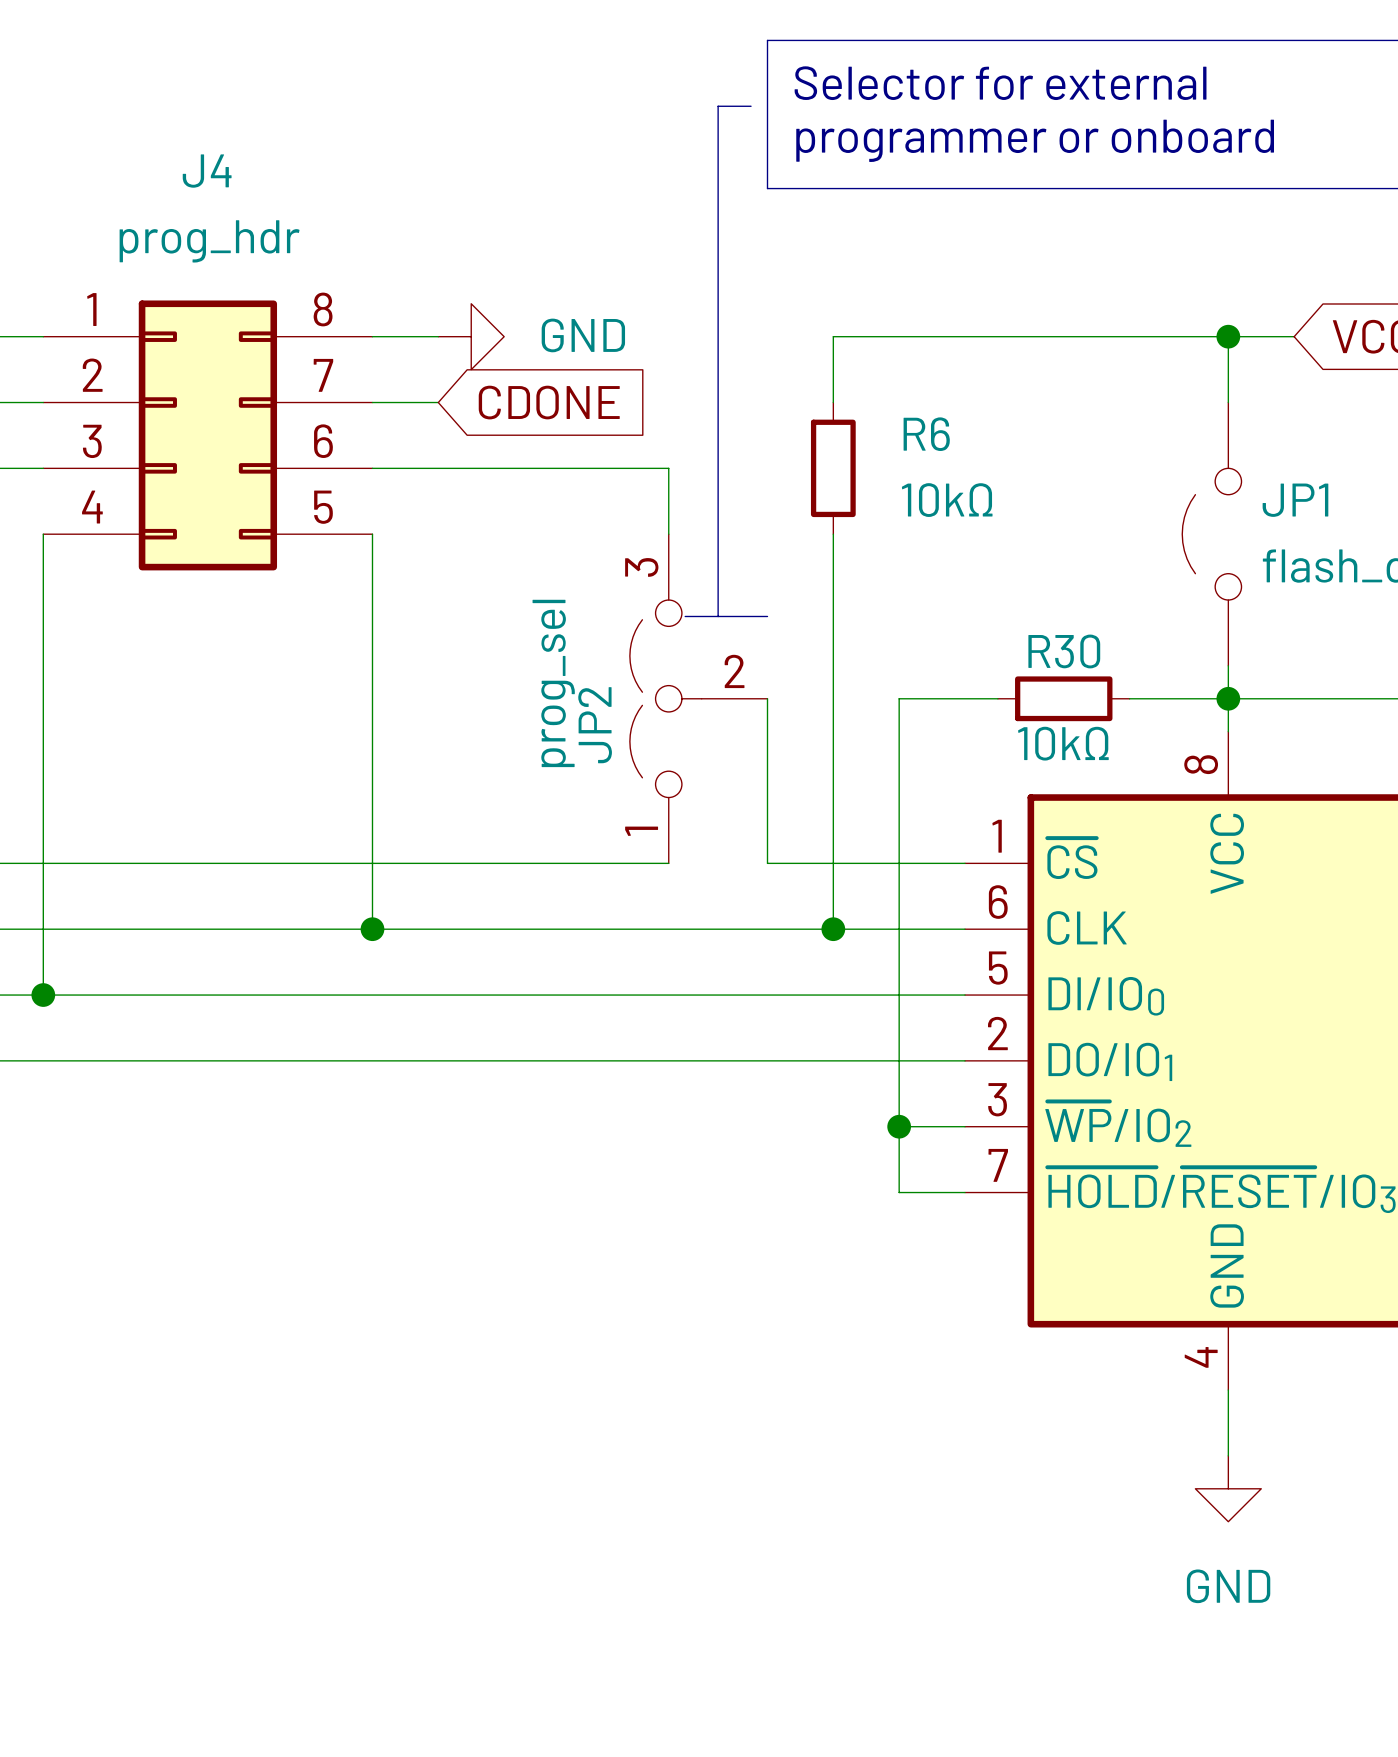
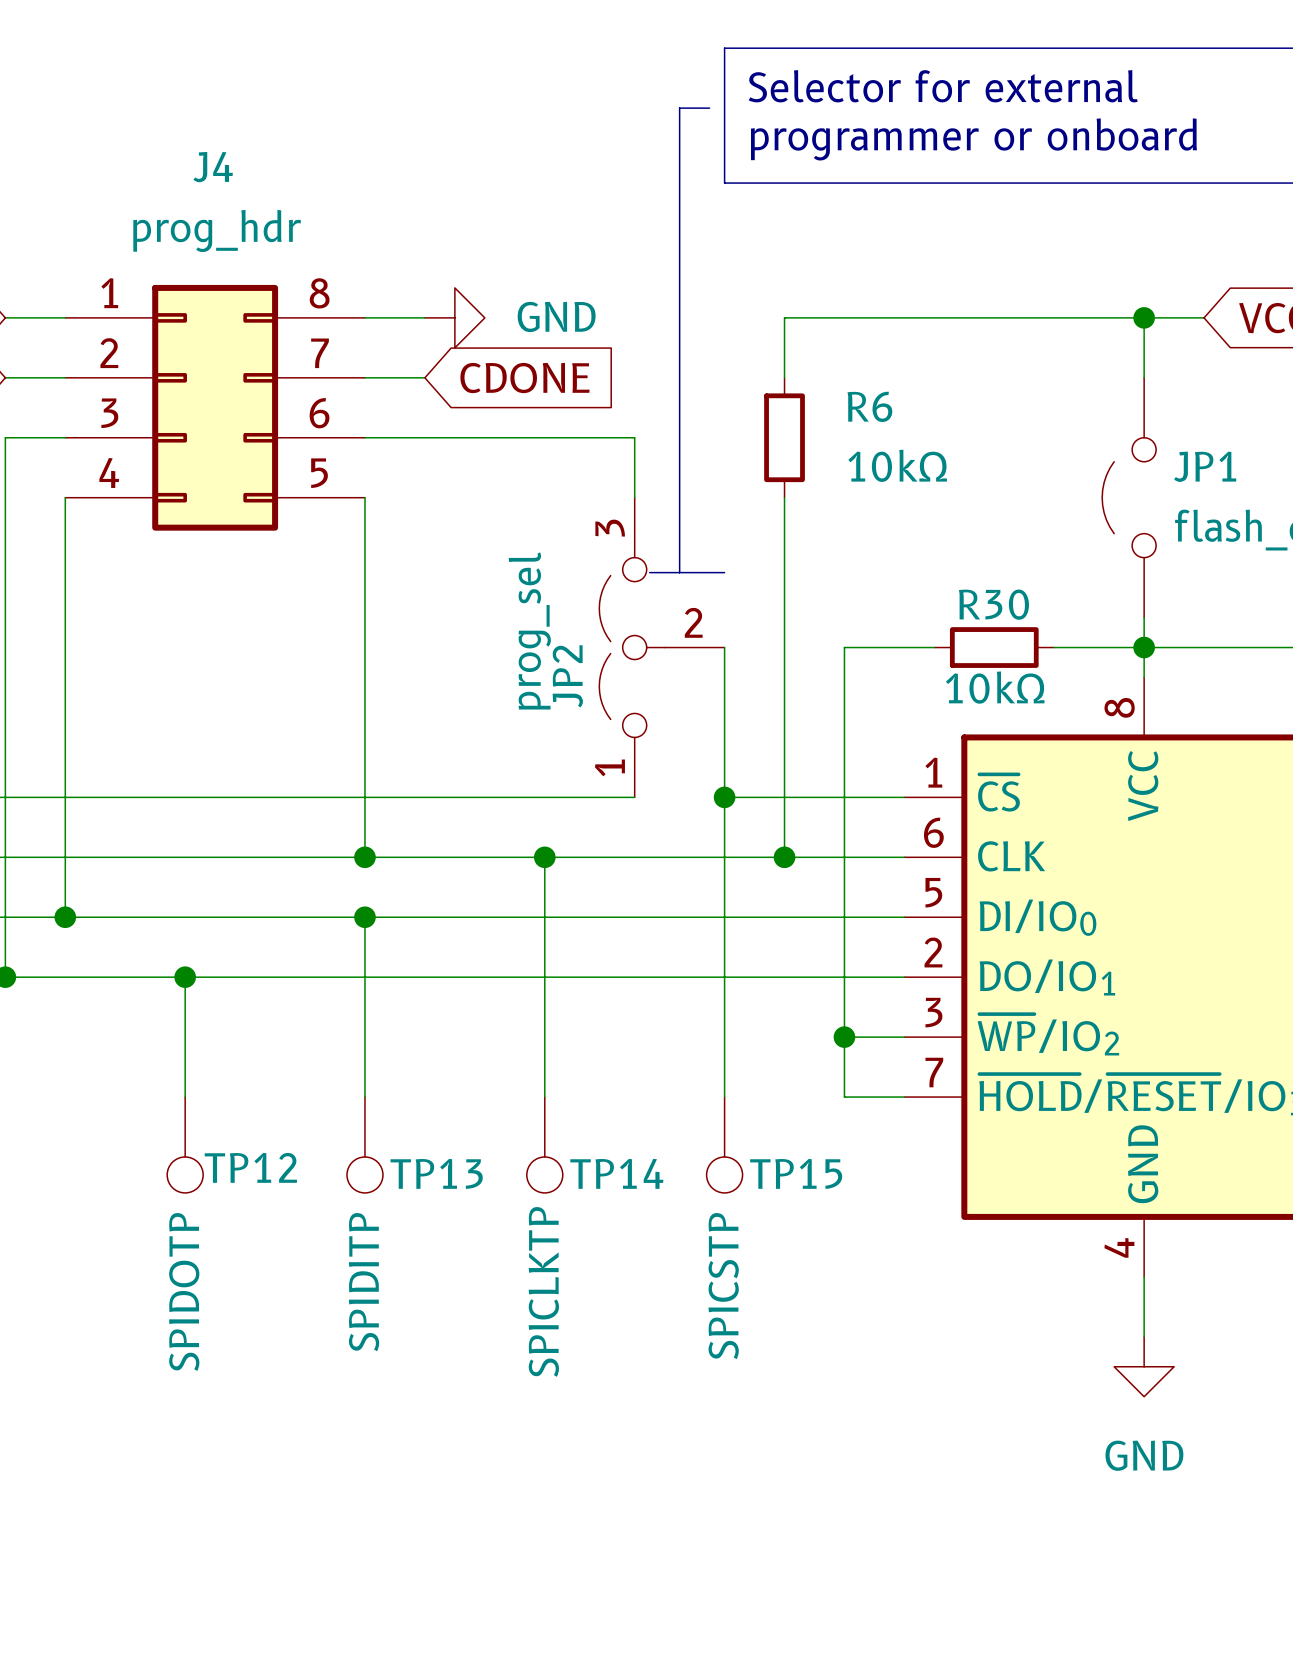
wire: none -> (724, 797) (724, 1097)
junction: none -> (724, 797)
wire: none -> (544, 857) (544, 1097)
junction: none -> (544, 857)
wire: none -> (364, 917) (364, 1097)
junction: none -> (364, 917)
wire: none -> (185, 977) (185, 1097)
junction: none -> (185, 977)
TP12: none -> SPIDOTP (185, 1144)
TP13: none -> SPIDITP (364, 1144)
TP14: none -> SPICLKTP (544, 1144)
TP15: none -> SPICSTP (724, 1144)

